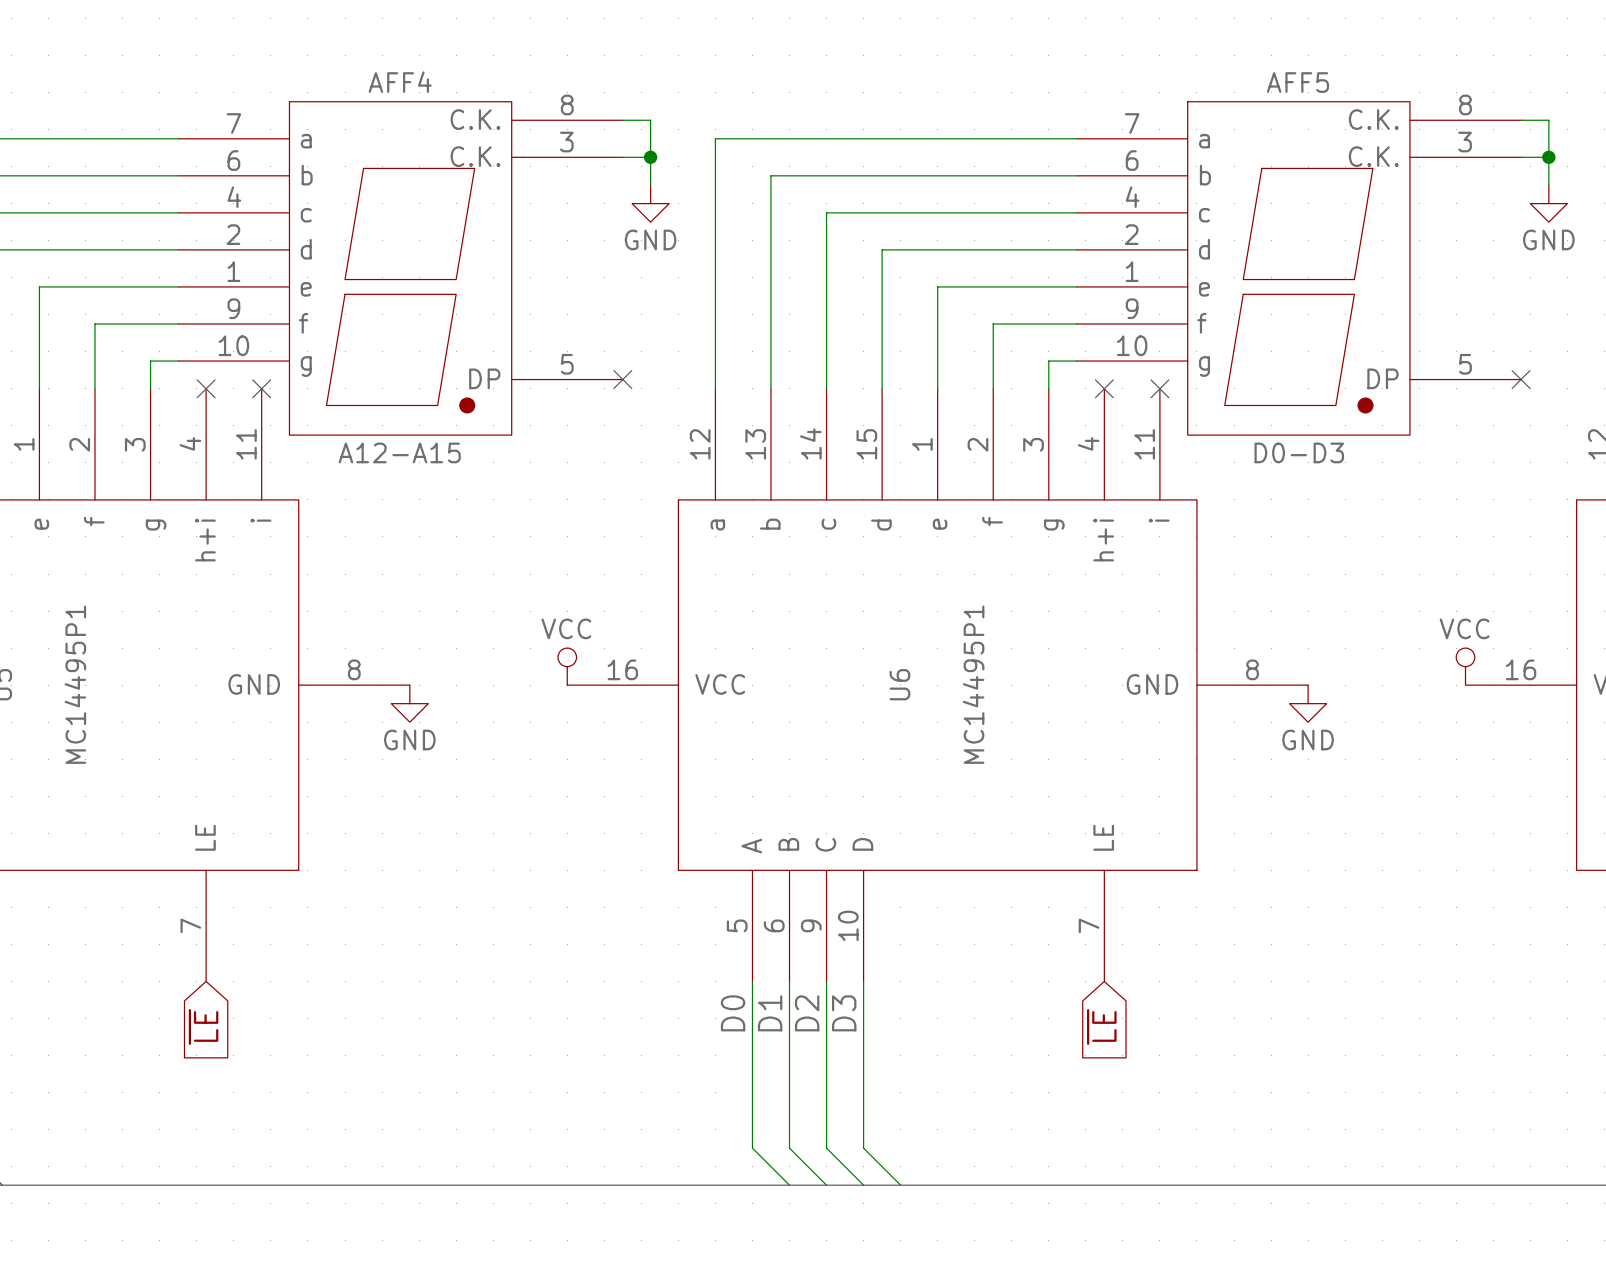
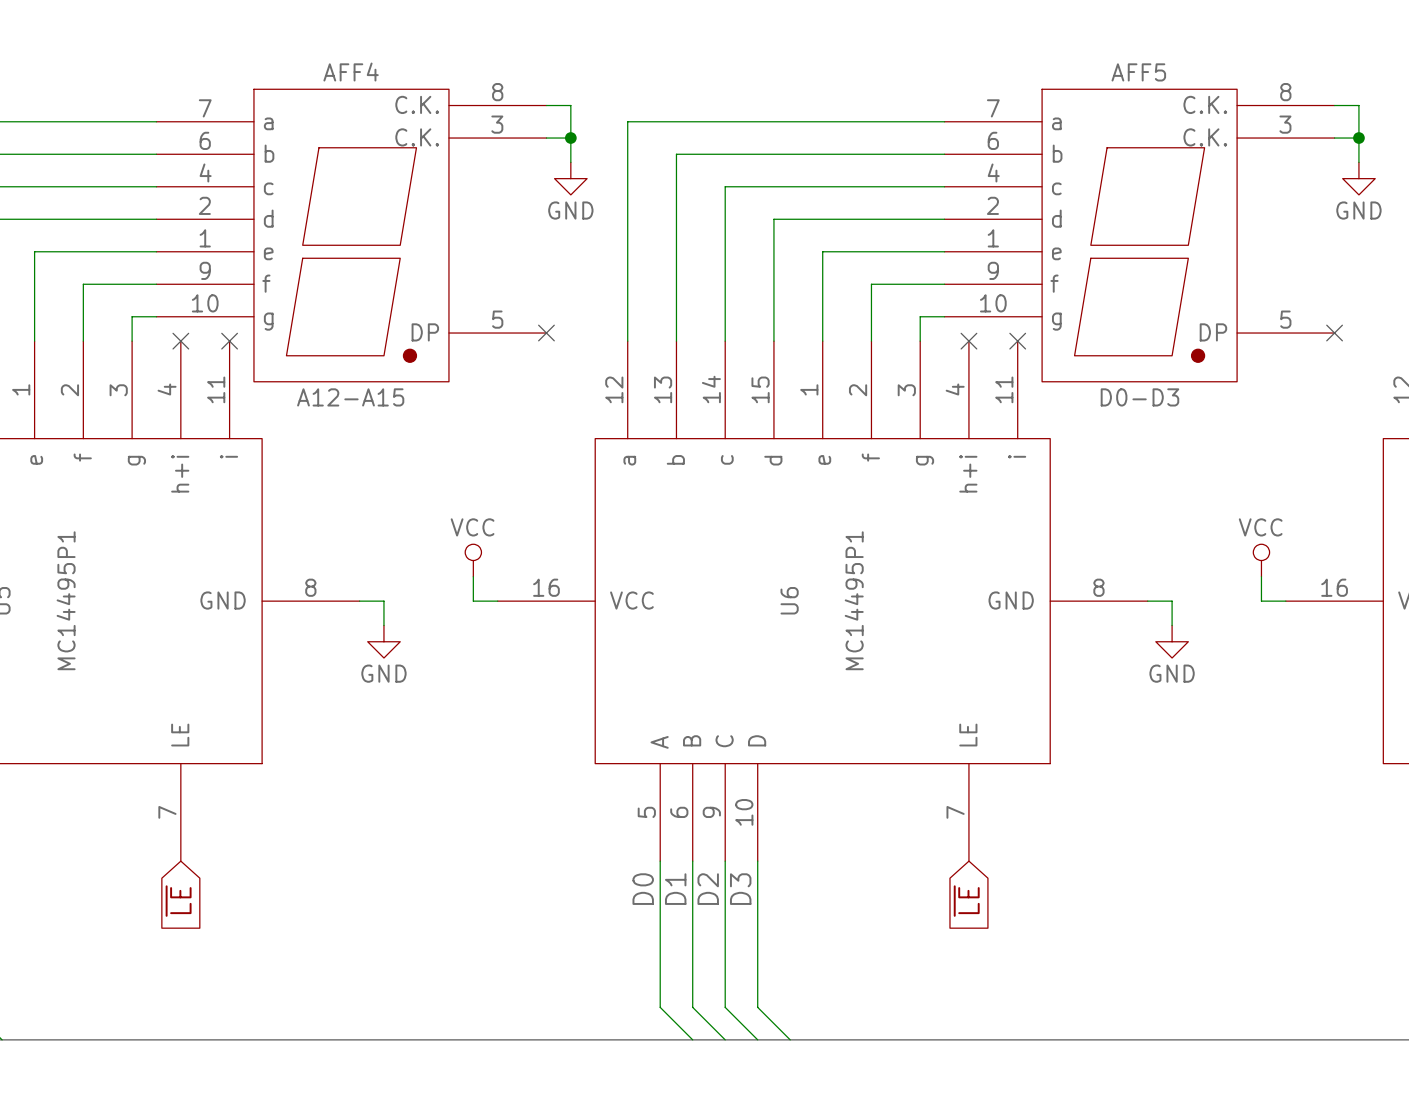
wire: none -> (473, 576) (473, 601) (497, 601)
wire: none -> (1261, 576) (1261, 601) (1285, 601)
power symbol position: VCC (567, 666) -> VCC (473, 560)
power symbol position: VCC (1465, 666) -> VCC (1261, 560)
wire: none -> (359, 601) (383, 601) (383, 625)
wire: none -> (1147, 601) (1172, 601) (1172, 625)
power symbol position: GND (409, 703) -> GND (383, 641)
power symbol position: GND (1308, 703) -> GND (1172, 641)

